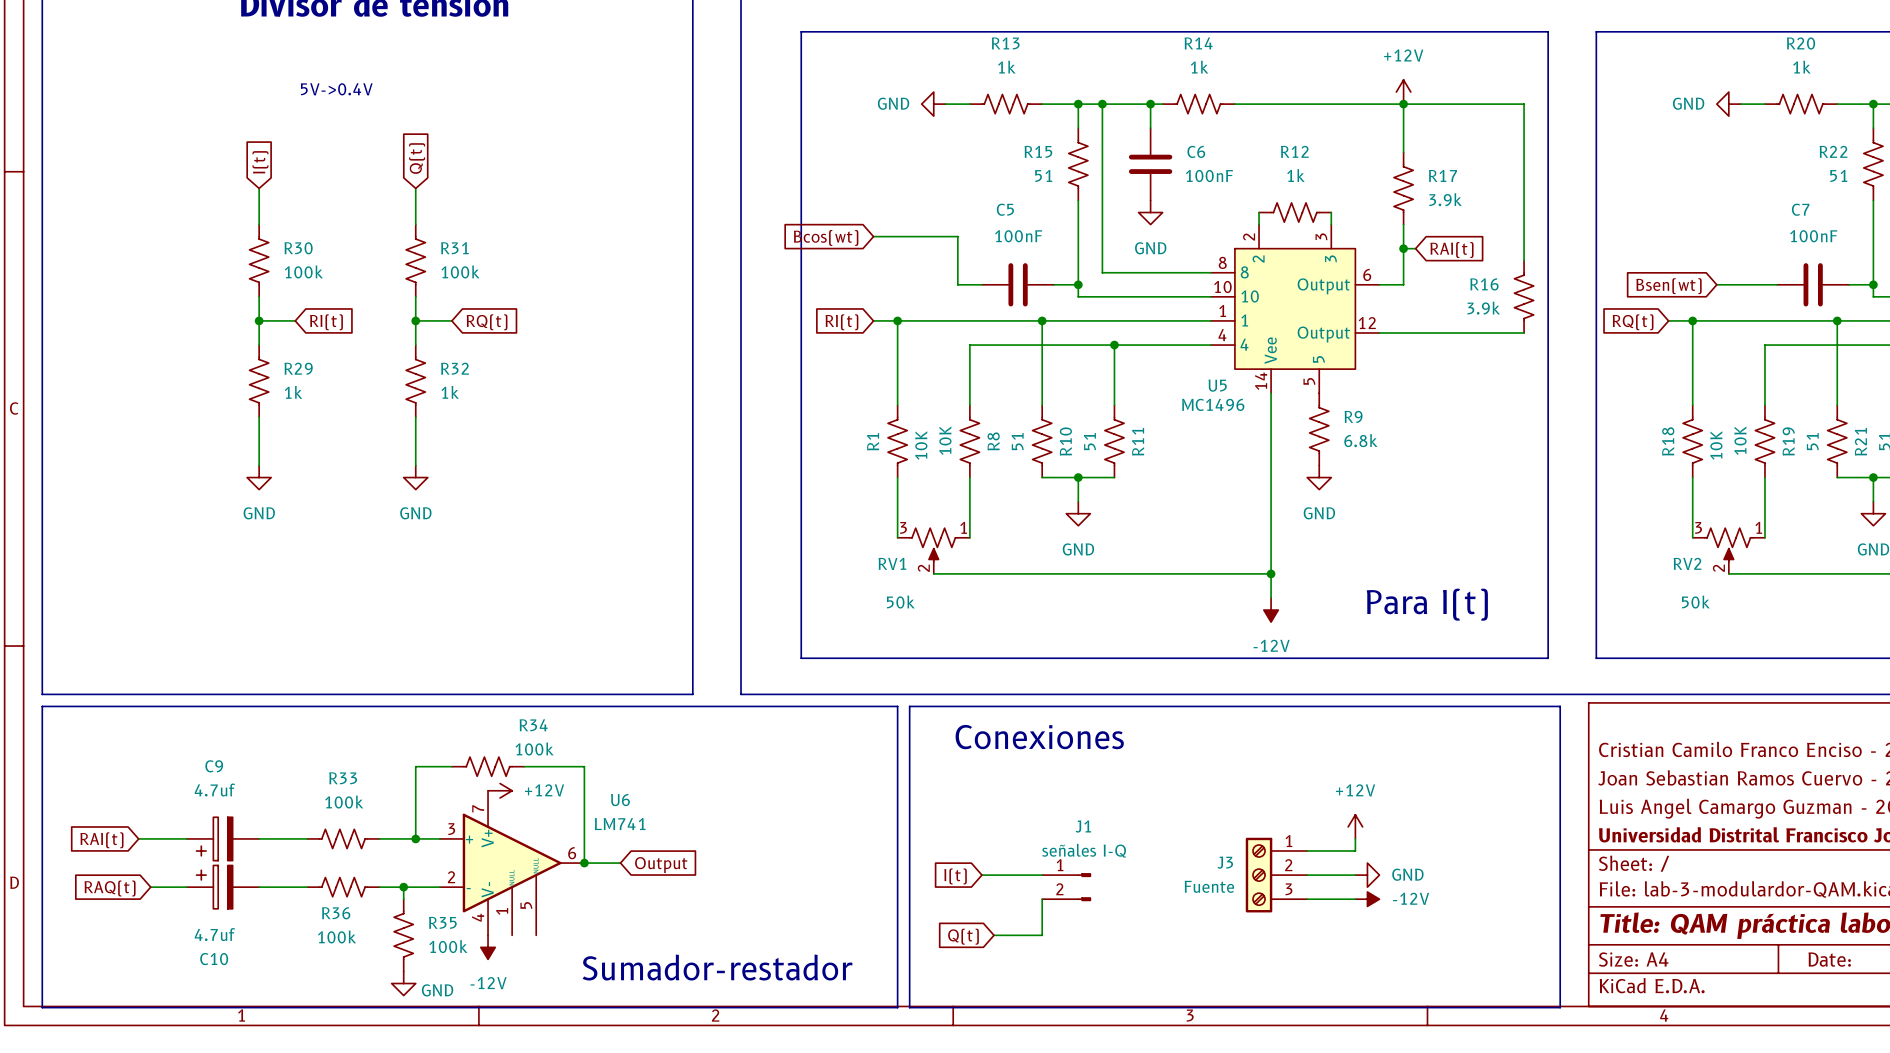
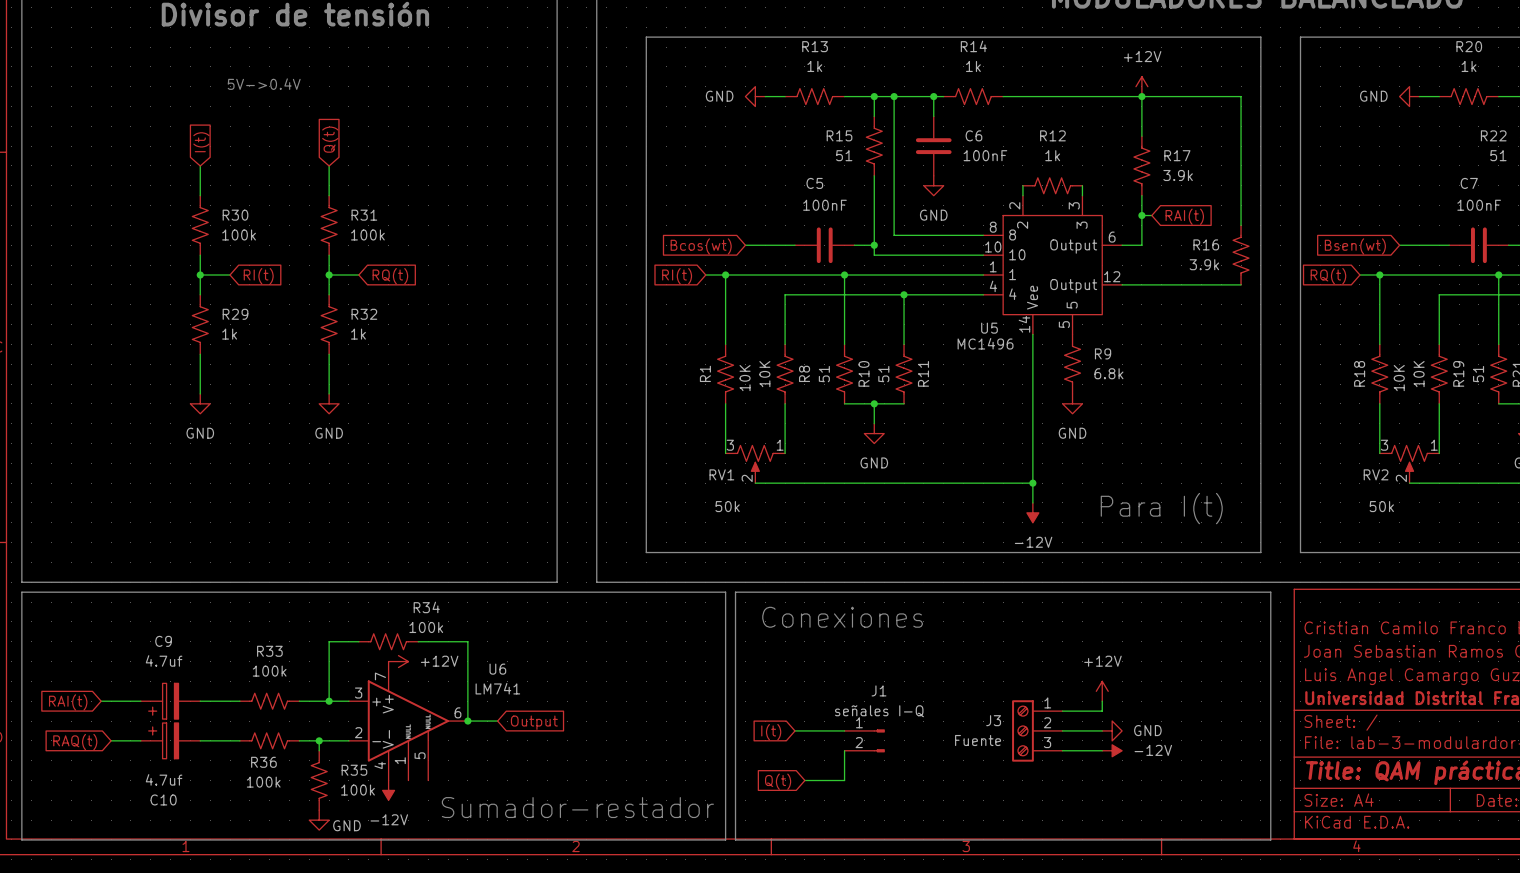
wire: (873, 236) (957, 236) (957, 284) -> (745, 245) (775, 245)
global label position: Bcos(wt) (826, 237) -> Bcos(wt) (701, 246)

